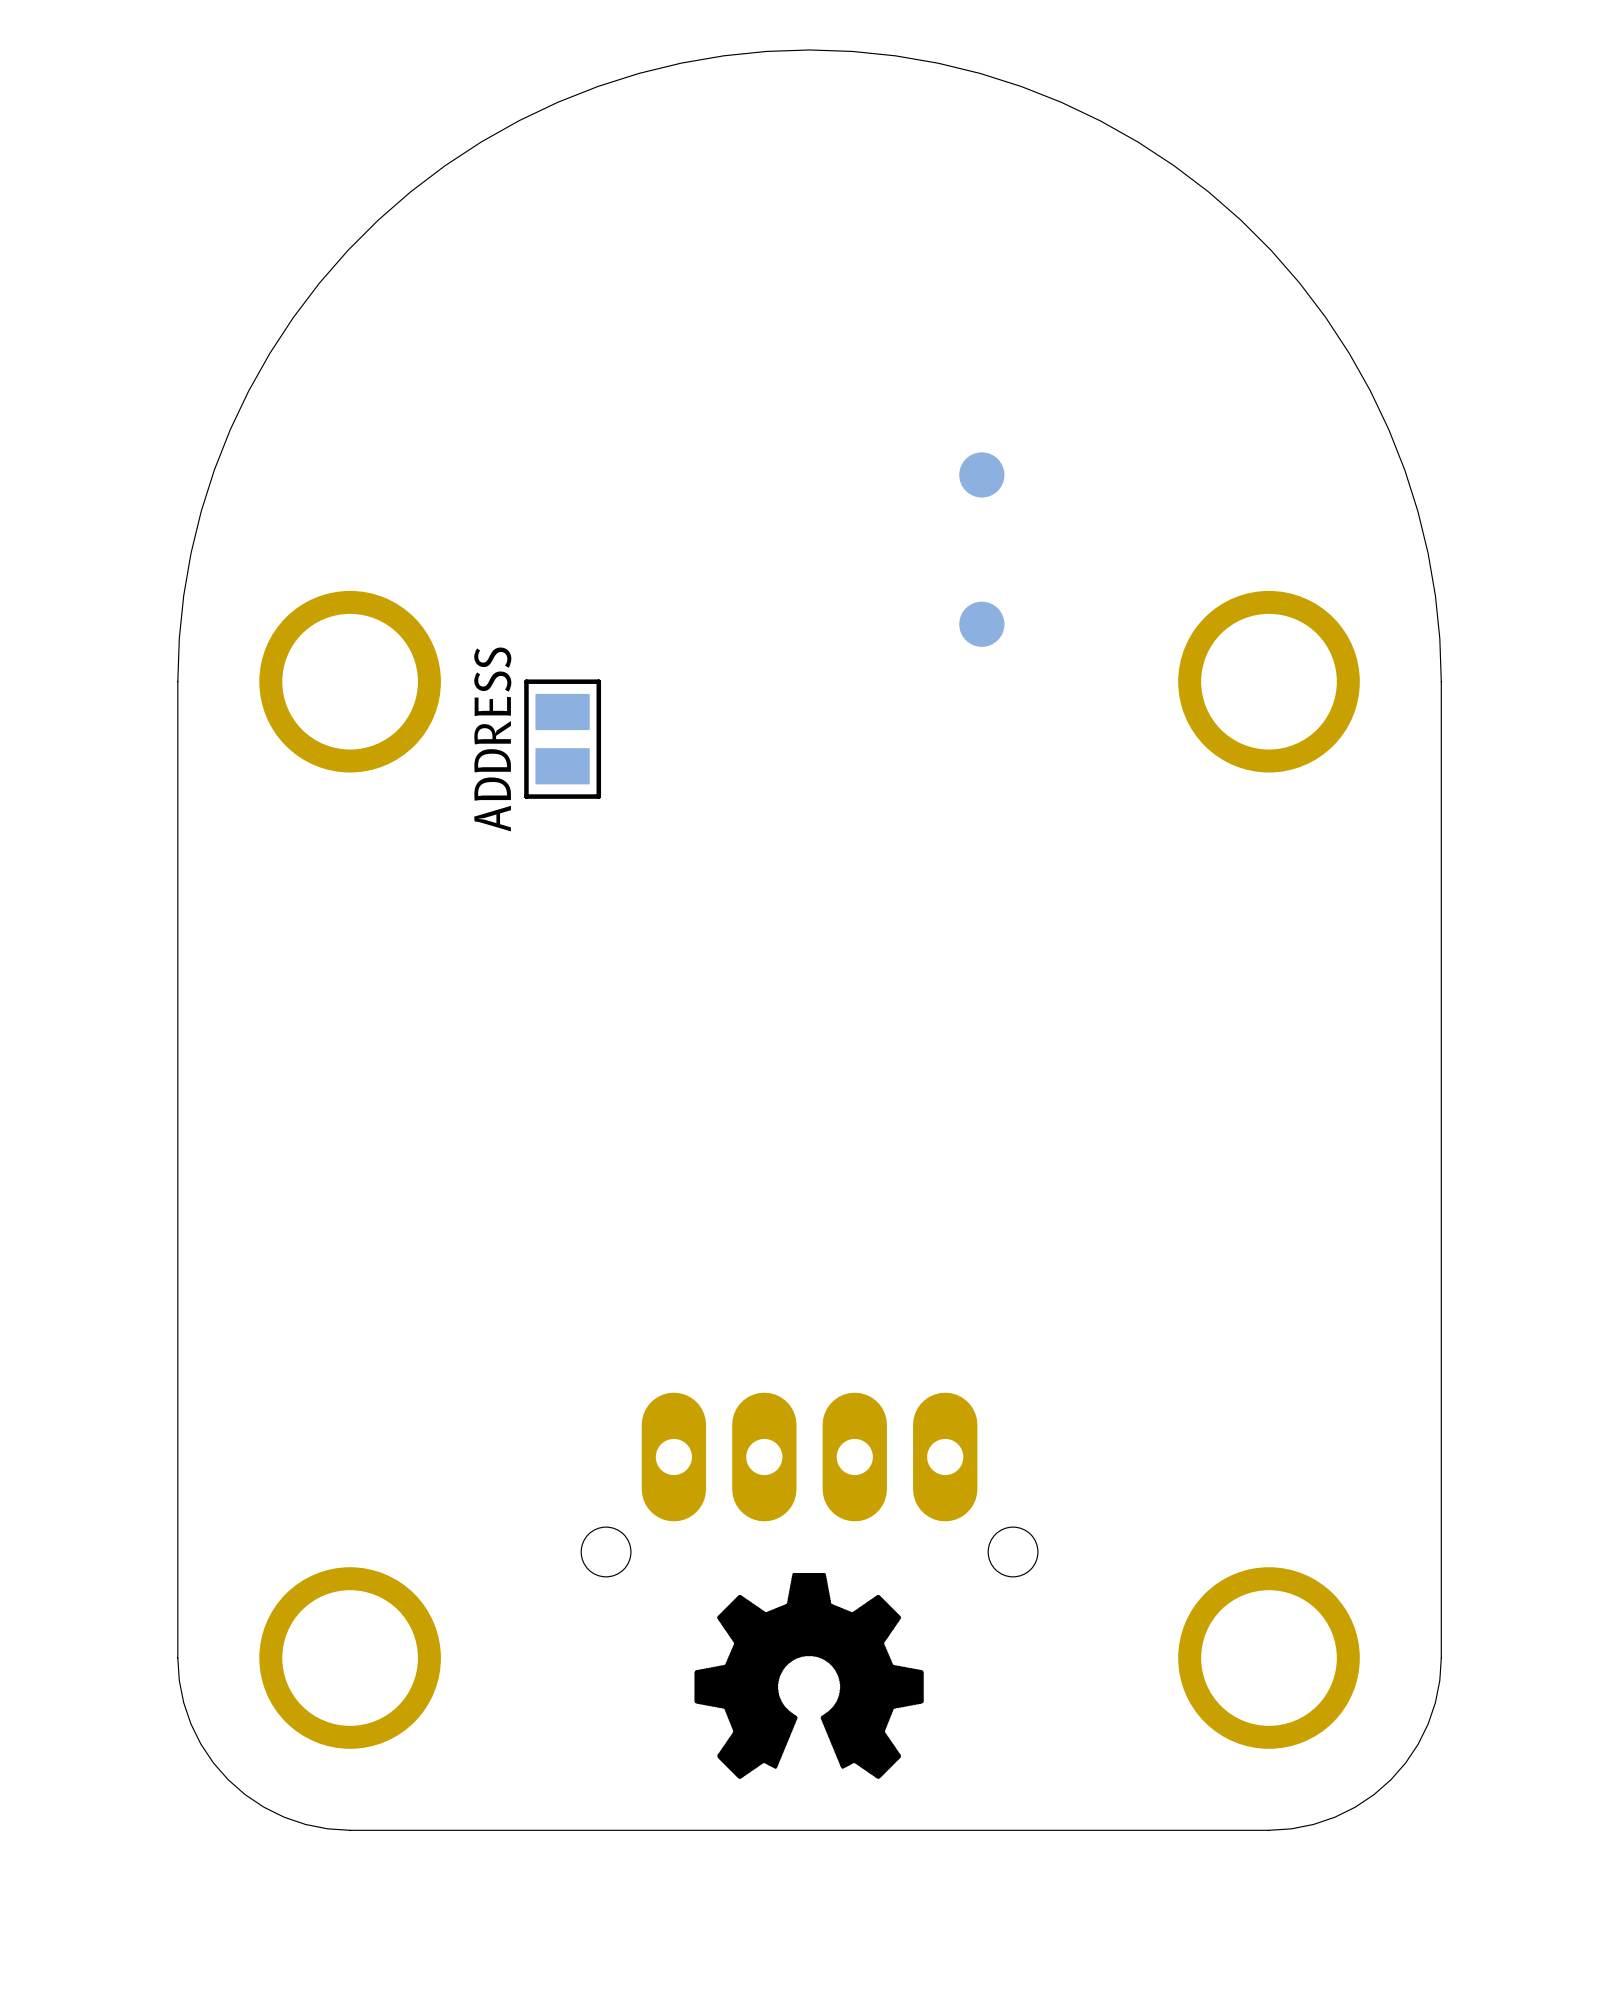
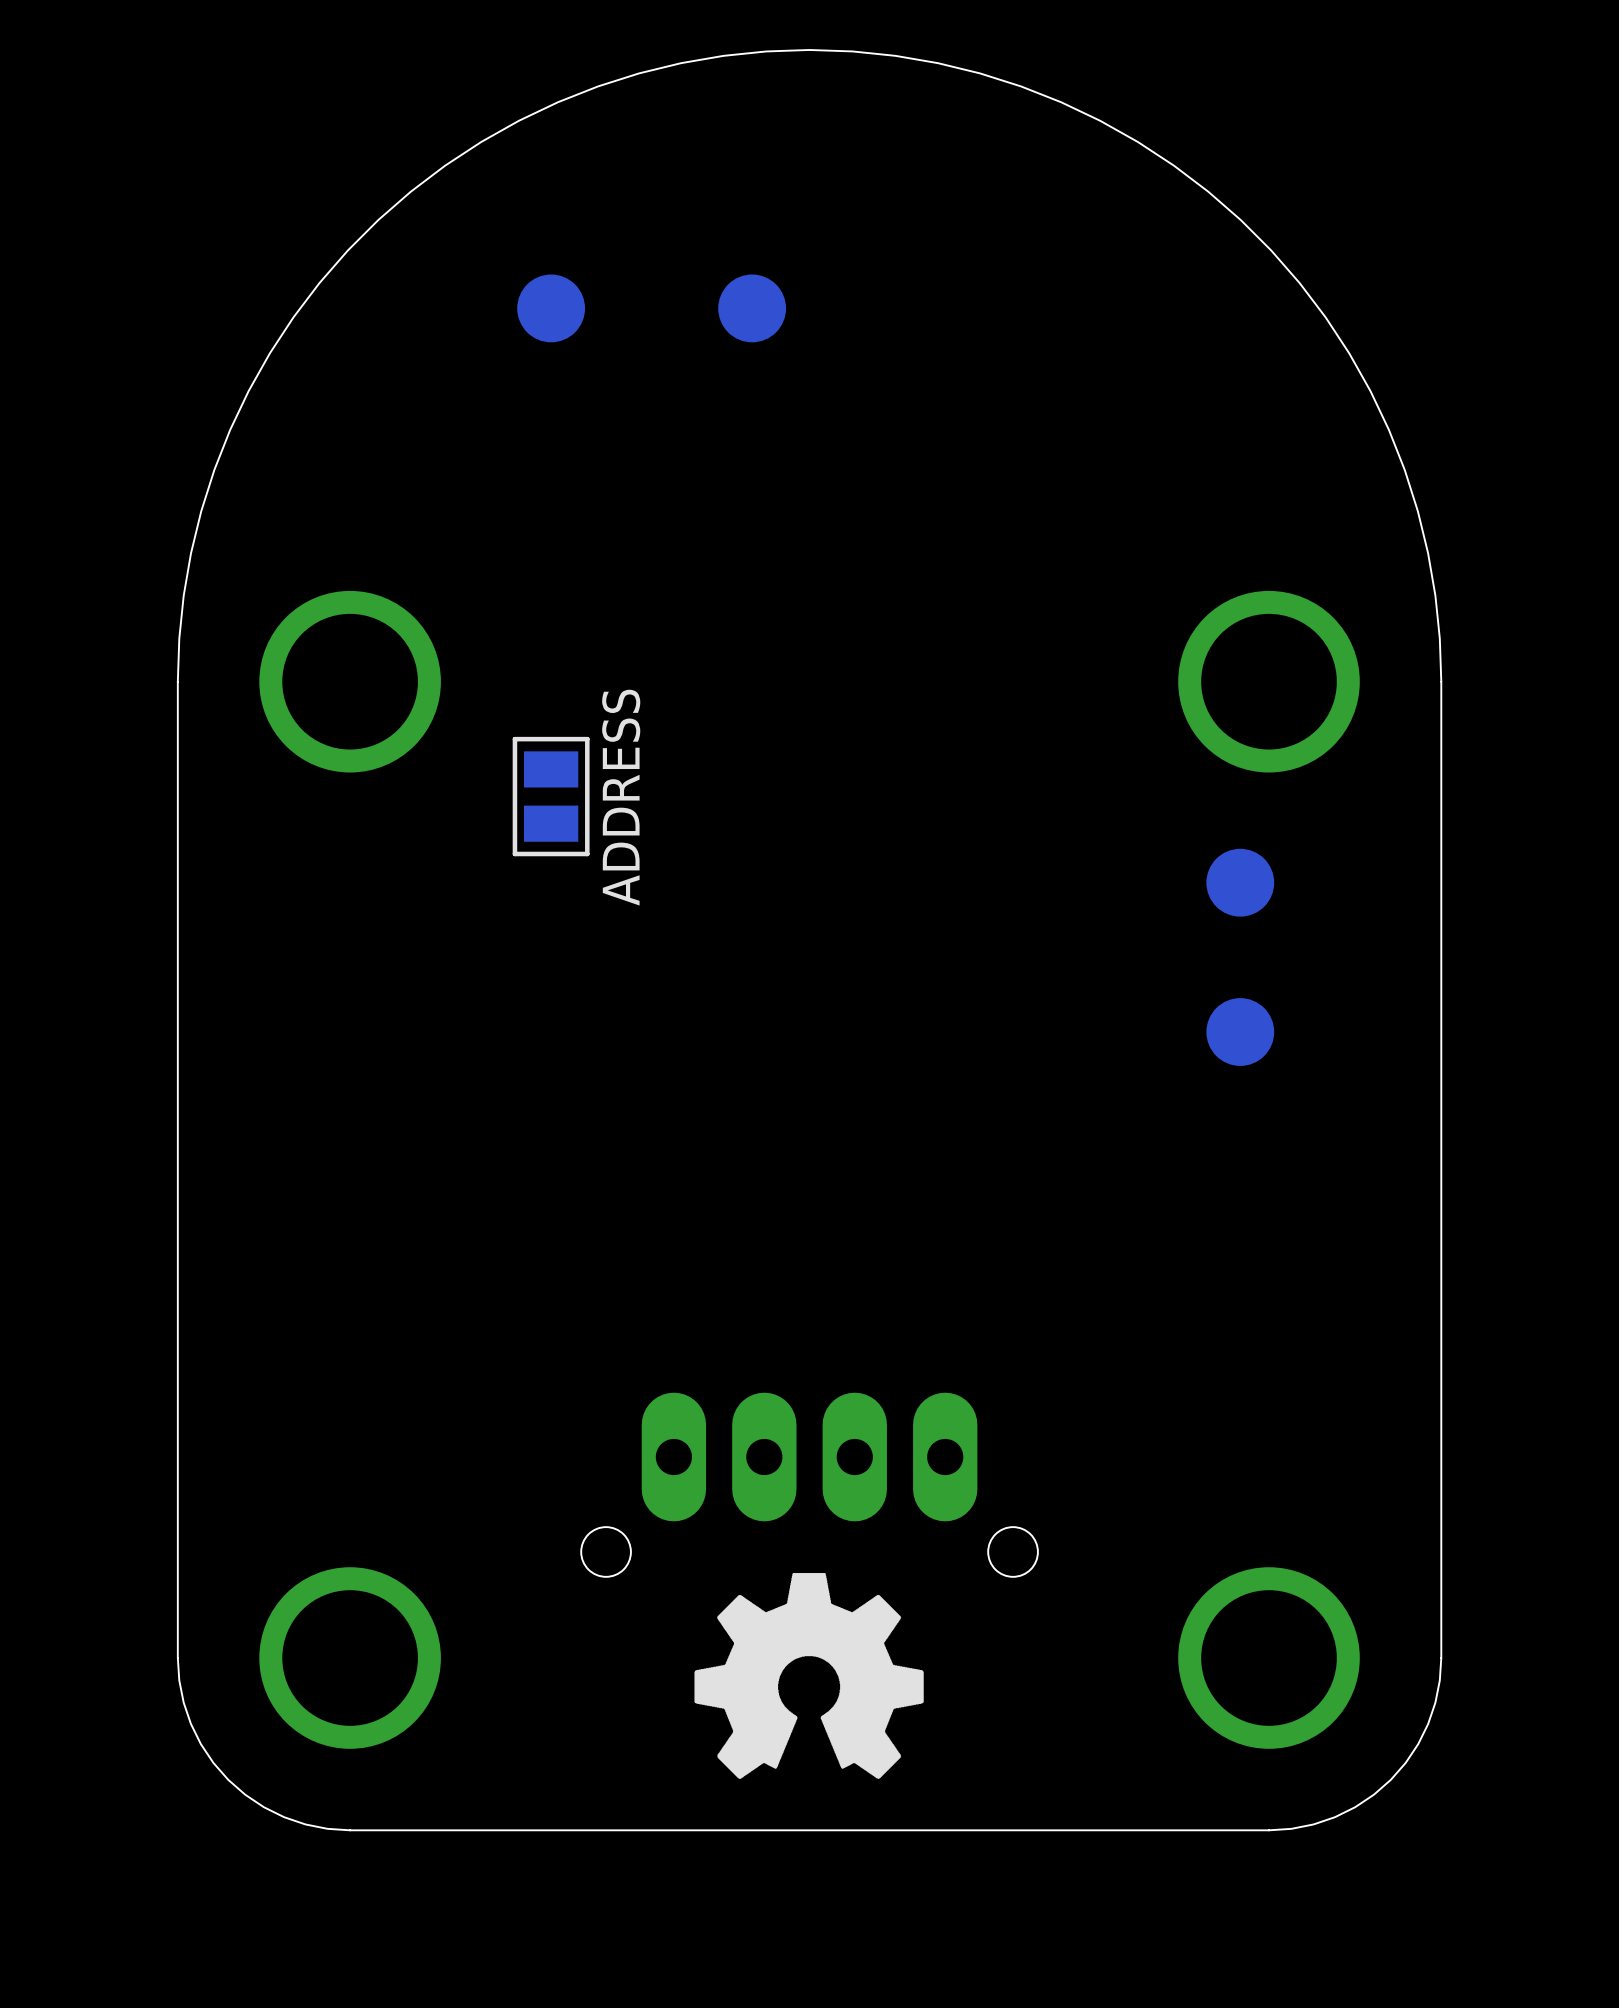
part: none -> (551, 308)
part: none -> (752, 308)
part: (981, 474) -> none
part: (981, 624) -> none
text position: ADDRESS (492, 739) -> ADDRESS (621, 797)
part position: (562, 739) -> (551, 796)
part: none -> (1240, 882)
part: none -> (1240, 1032)

